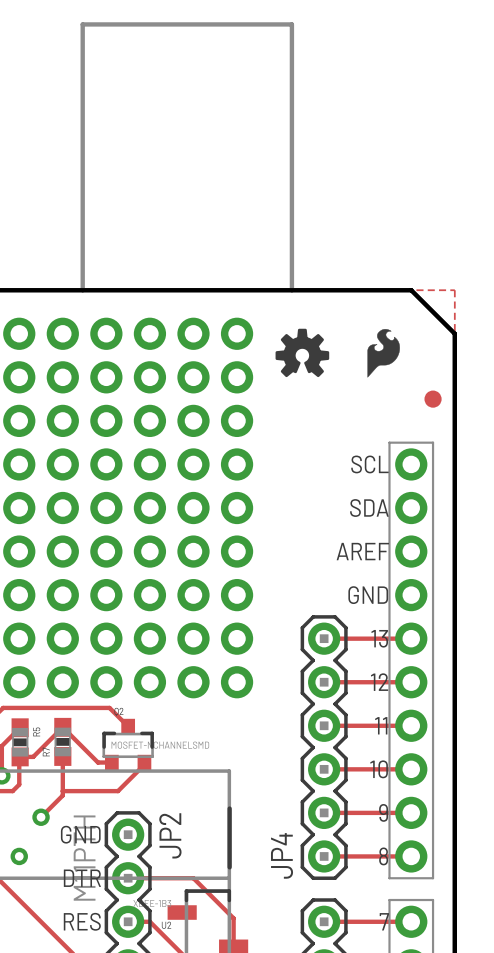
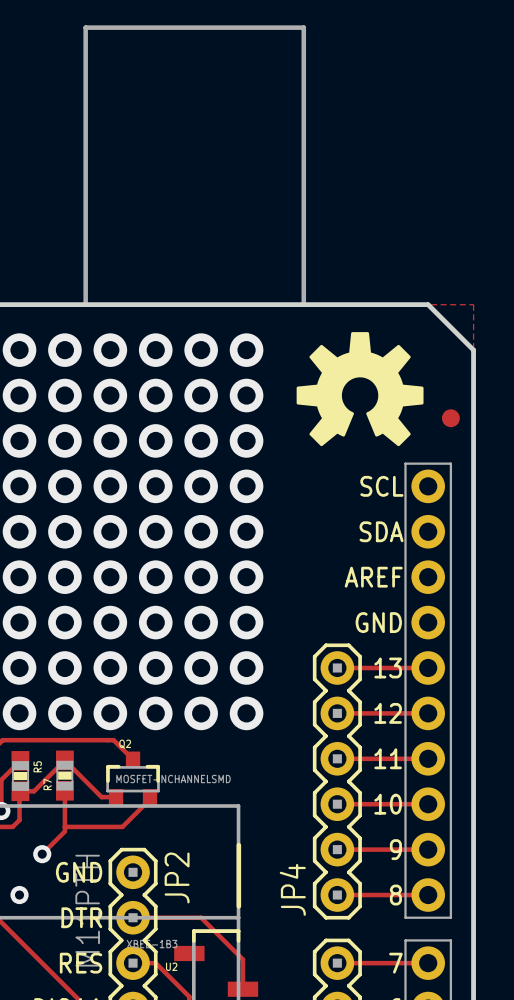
drawing: none -> [296, 332, 424, 447]
drawing: [275, 328, 330, 378] -> none
drawing: [367, 329, 400, 378] -> none

